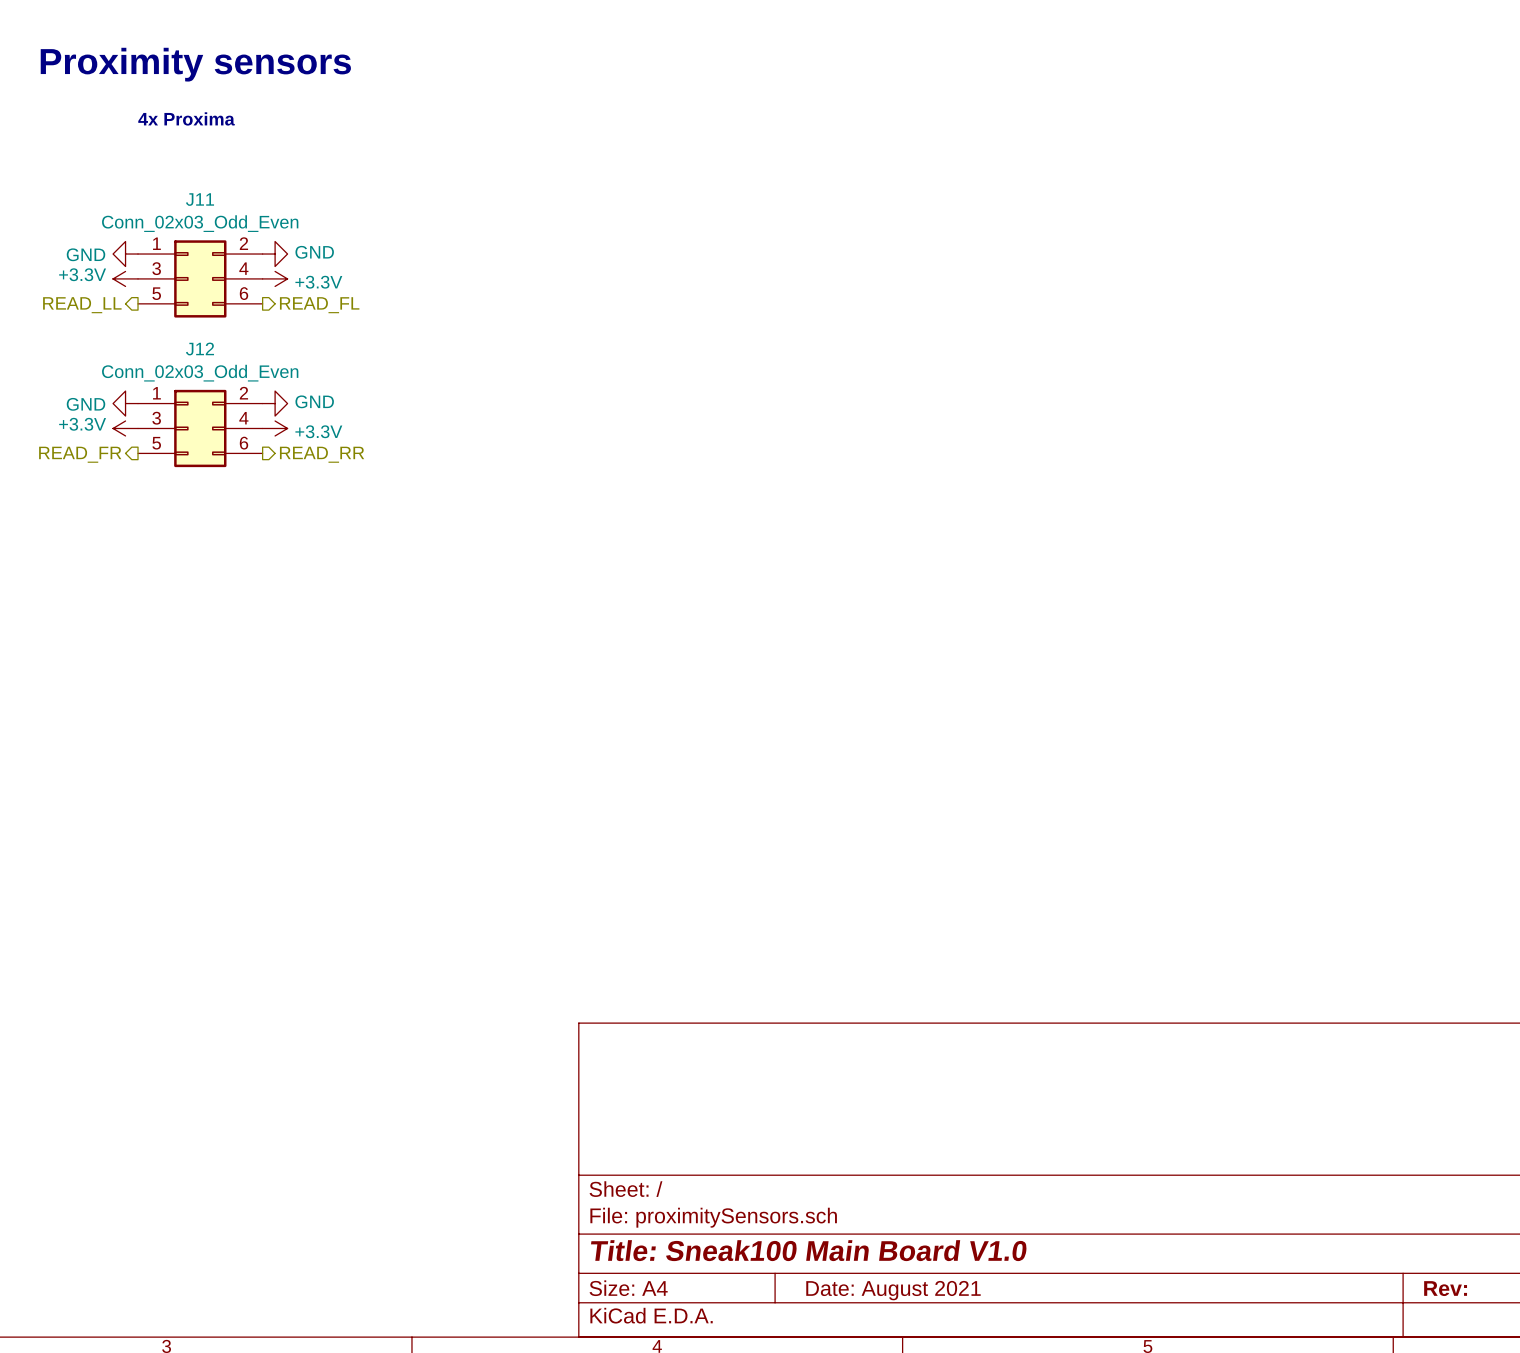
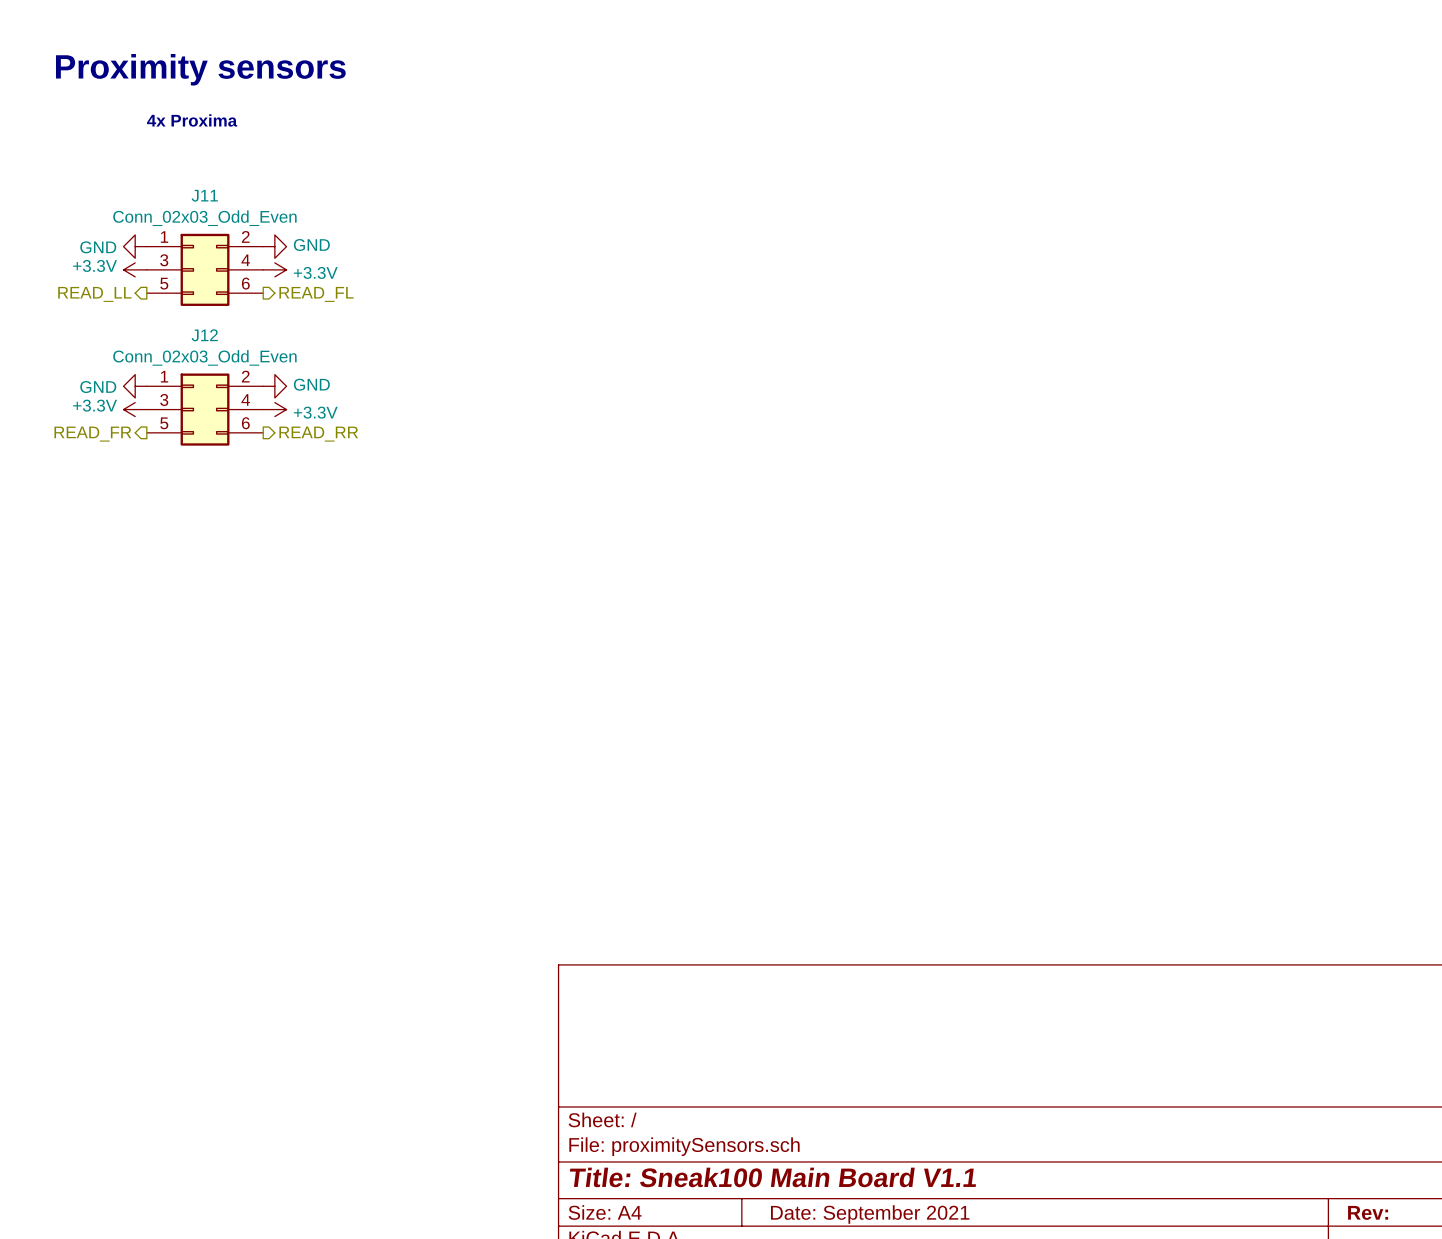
title block: Title: Sneak100 Main Board V1.0 (808, 1250) -> Title: Sneak100 Main Board V1.1 (772, 1177)
title block: Date: August 2021 (893, 1290) -> Date: September 2021 (870, 1214)

